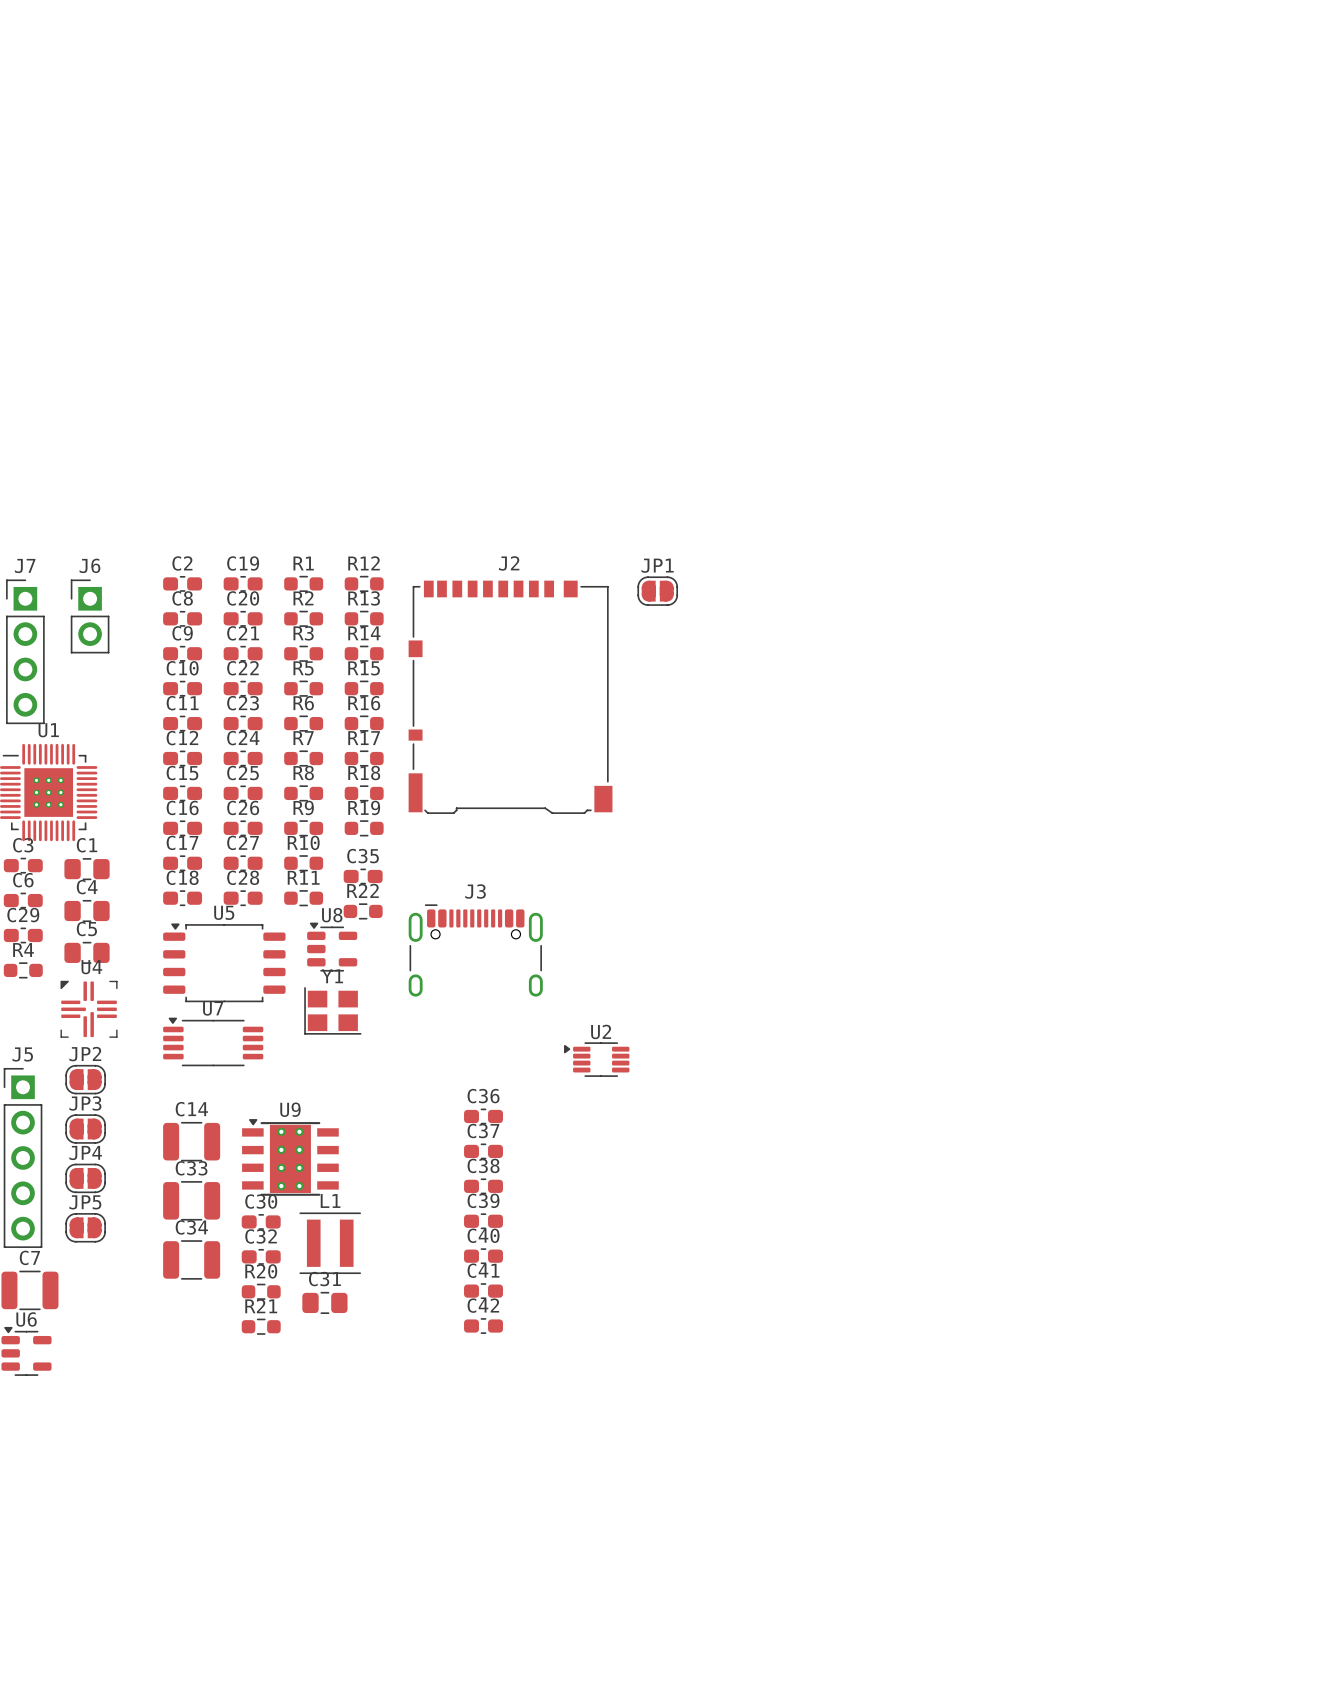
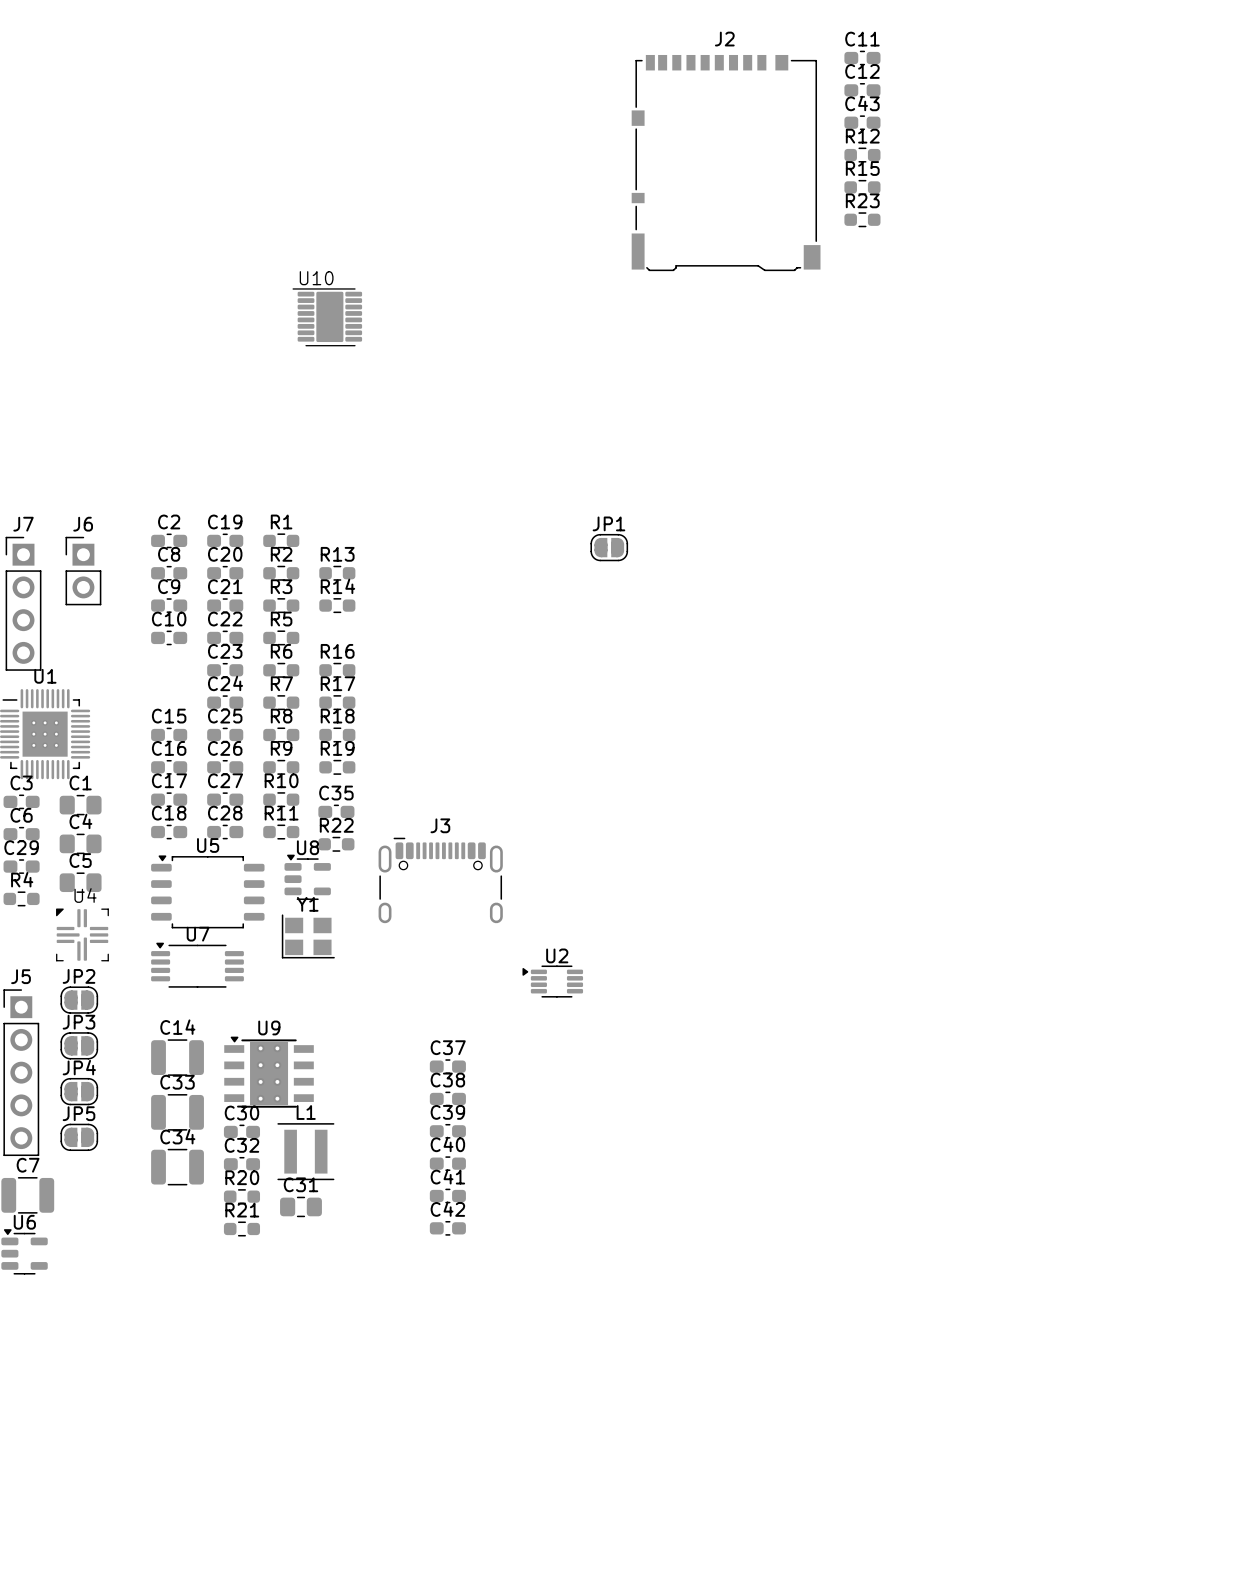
C43: none -> (862, 122)
R23: none -> (862, 219)
U10: none -> (327, 317)
R12 position: (364, 583) -> (862, 155)
R15 position: (364, 688) -> (862, 187)
J2 position: (510, 697) -> (726, 163)
C11 position: (182, 723) -> (862, 58)
C12 position: (182, 758) -> (862, 90)
C36: (483, 1116) -> none

